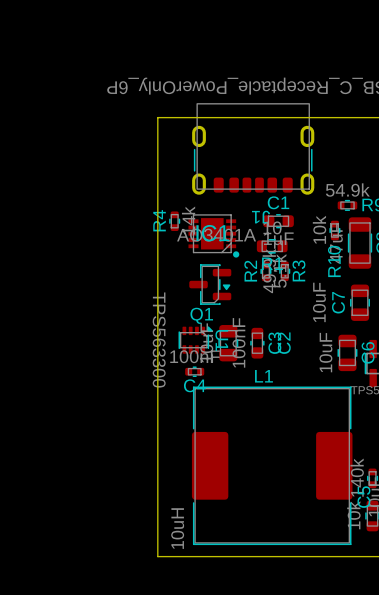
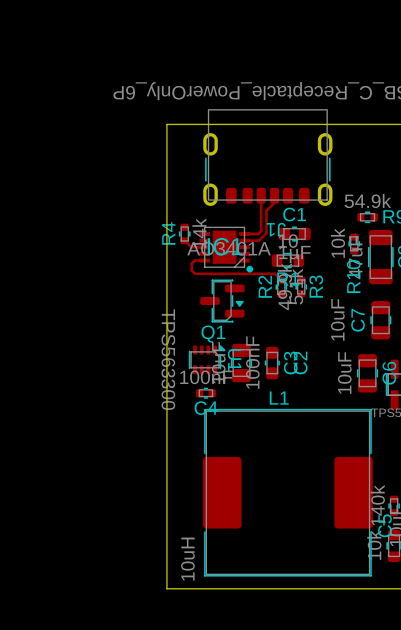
track: none -> (261, 195) (261, 230) (258, 234) (244, 234)
track: none -> (274, 195) (274, 202) (266, 210) (266, 233) (258, 240) (244, 240)
track: none -> (184, 240) (191, 247) (204, 247)
track: none -> (204, 260) (195, 260) (191, 263) (191, 270) (195, 273) (274, 273) (281, 280)

